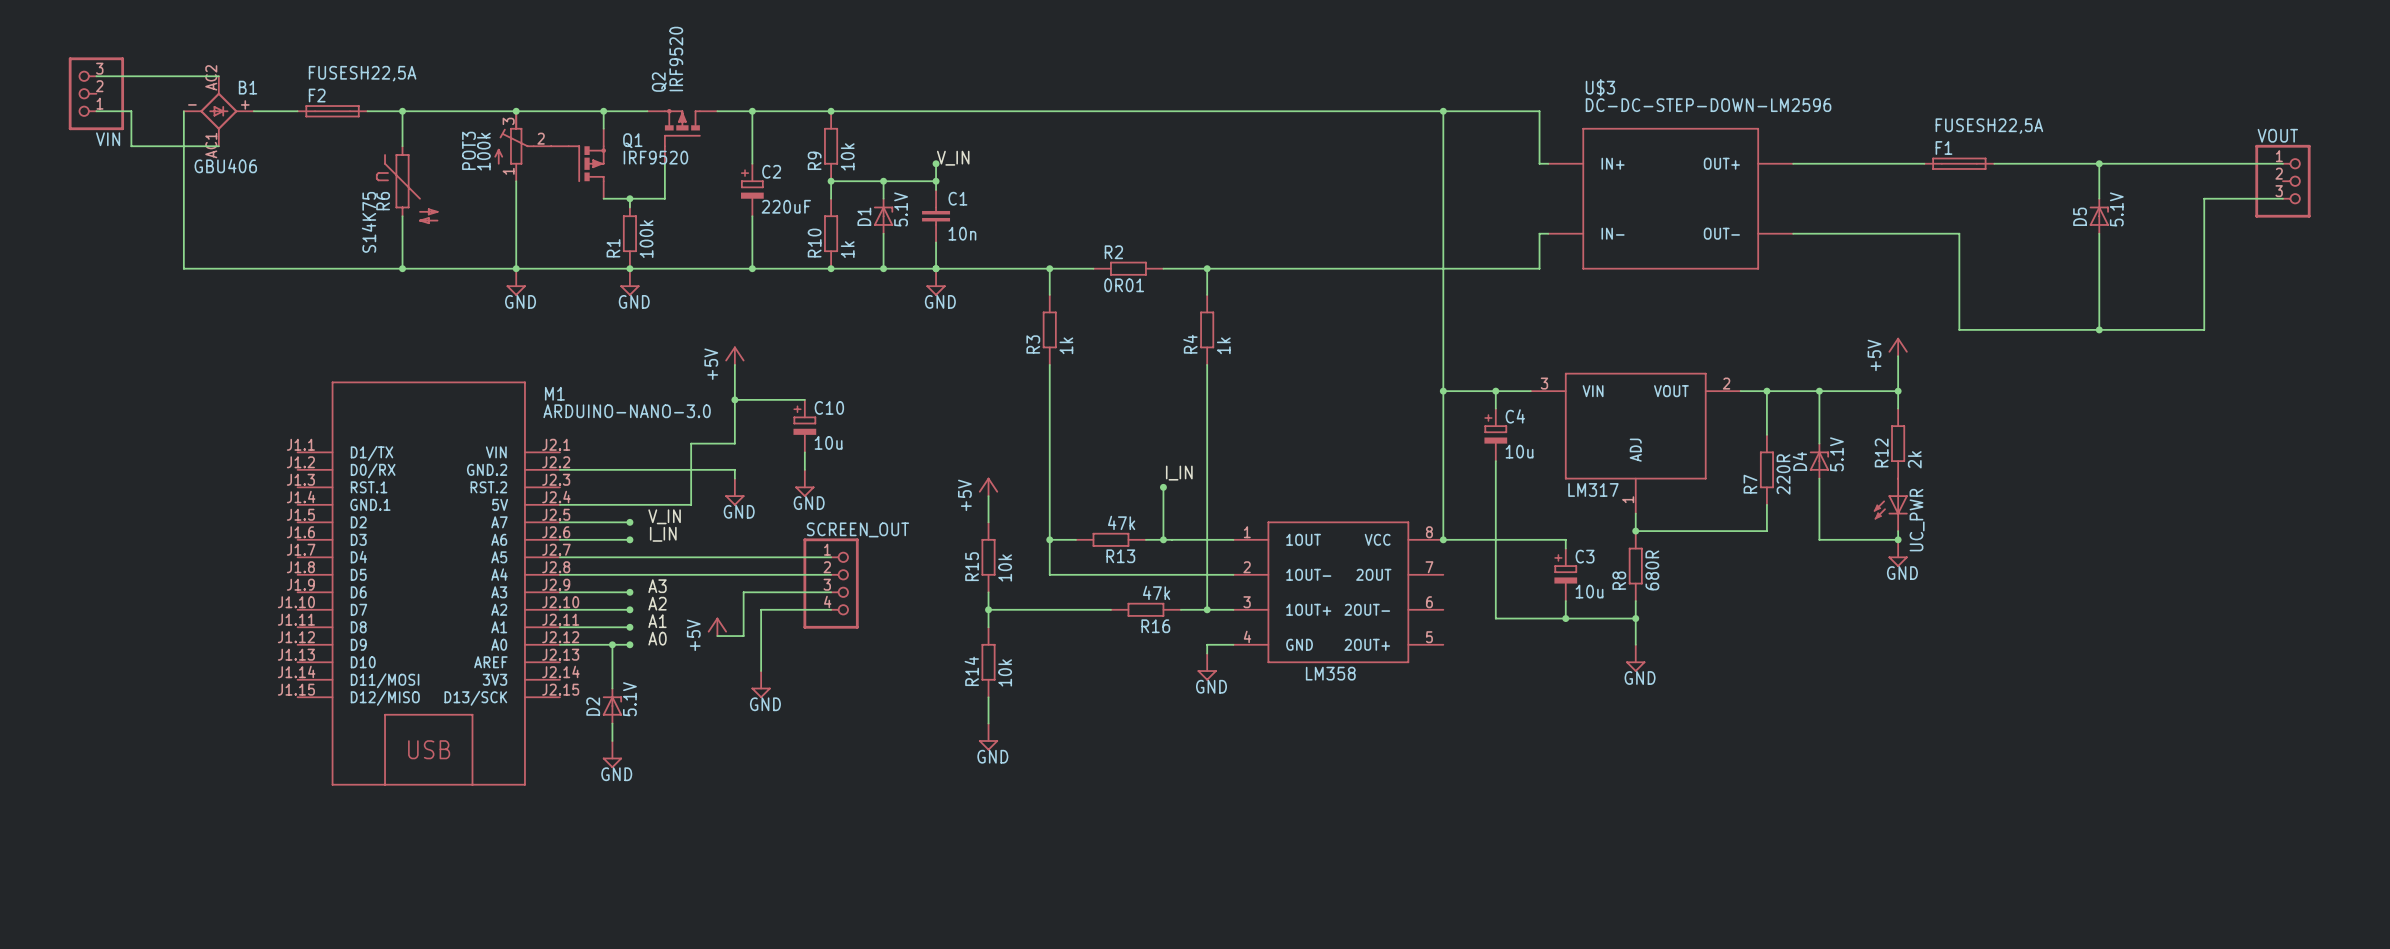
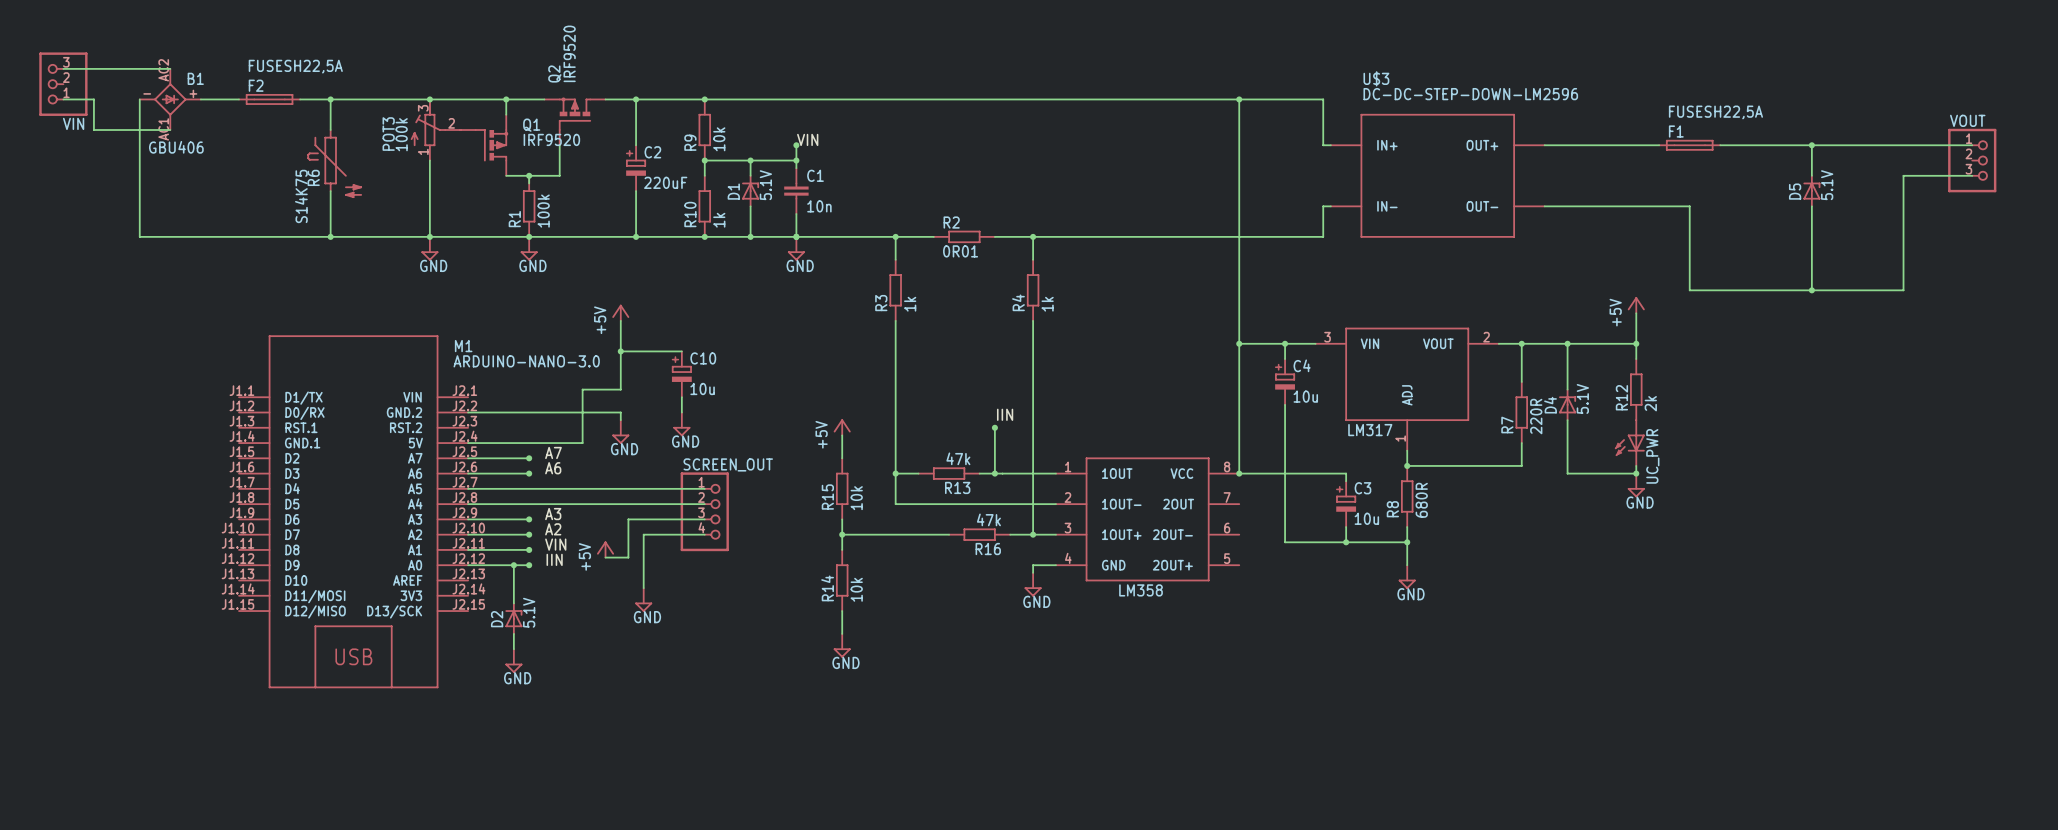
label: V_IN (953, 158) -> VIN (807, 139)
label: I_IN (1179, 473) -> IIN (1005, 414)
label: V_IN (664, 516) -> A7 (553, 452)
label: I_IN (663, 534) -> A6 (553, 468)
label: A1 (657, 621) -> VIN (555, 544)
label: A0 (657, 638) -> IIN (554, 559)

